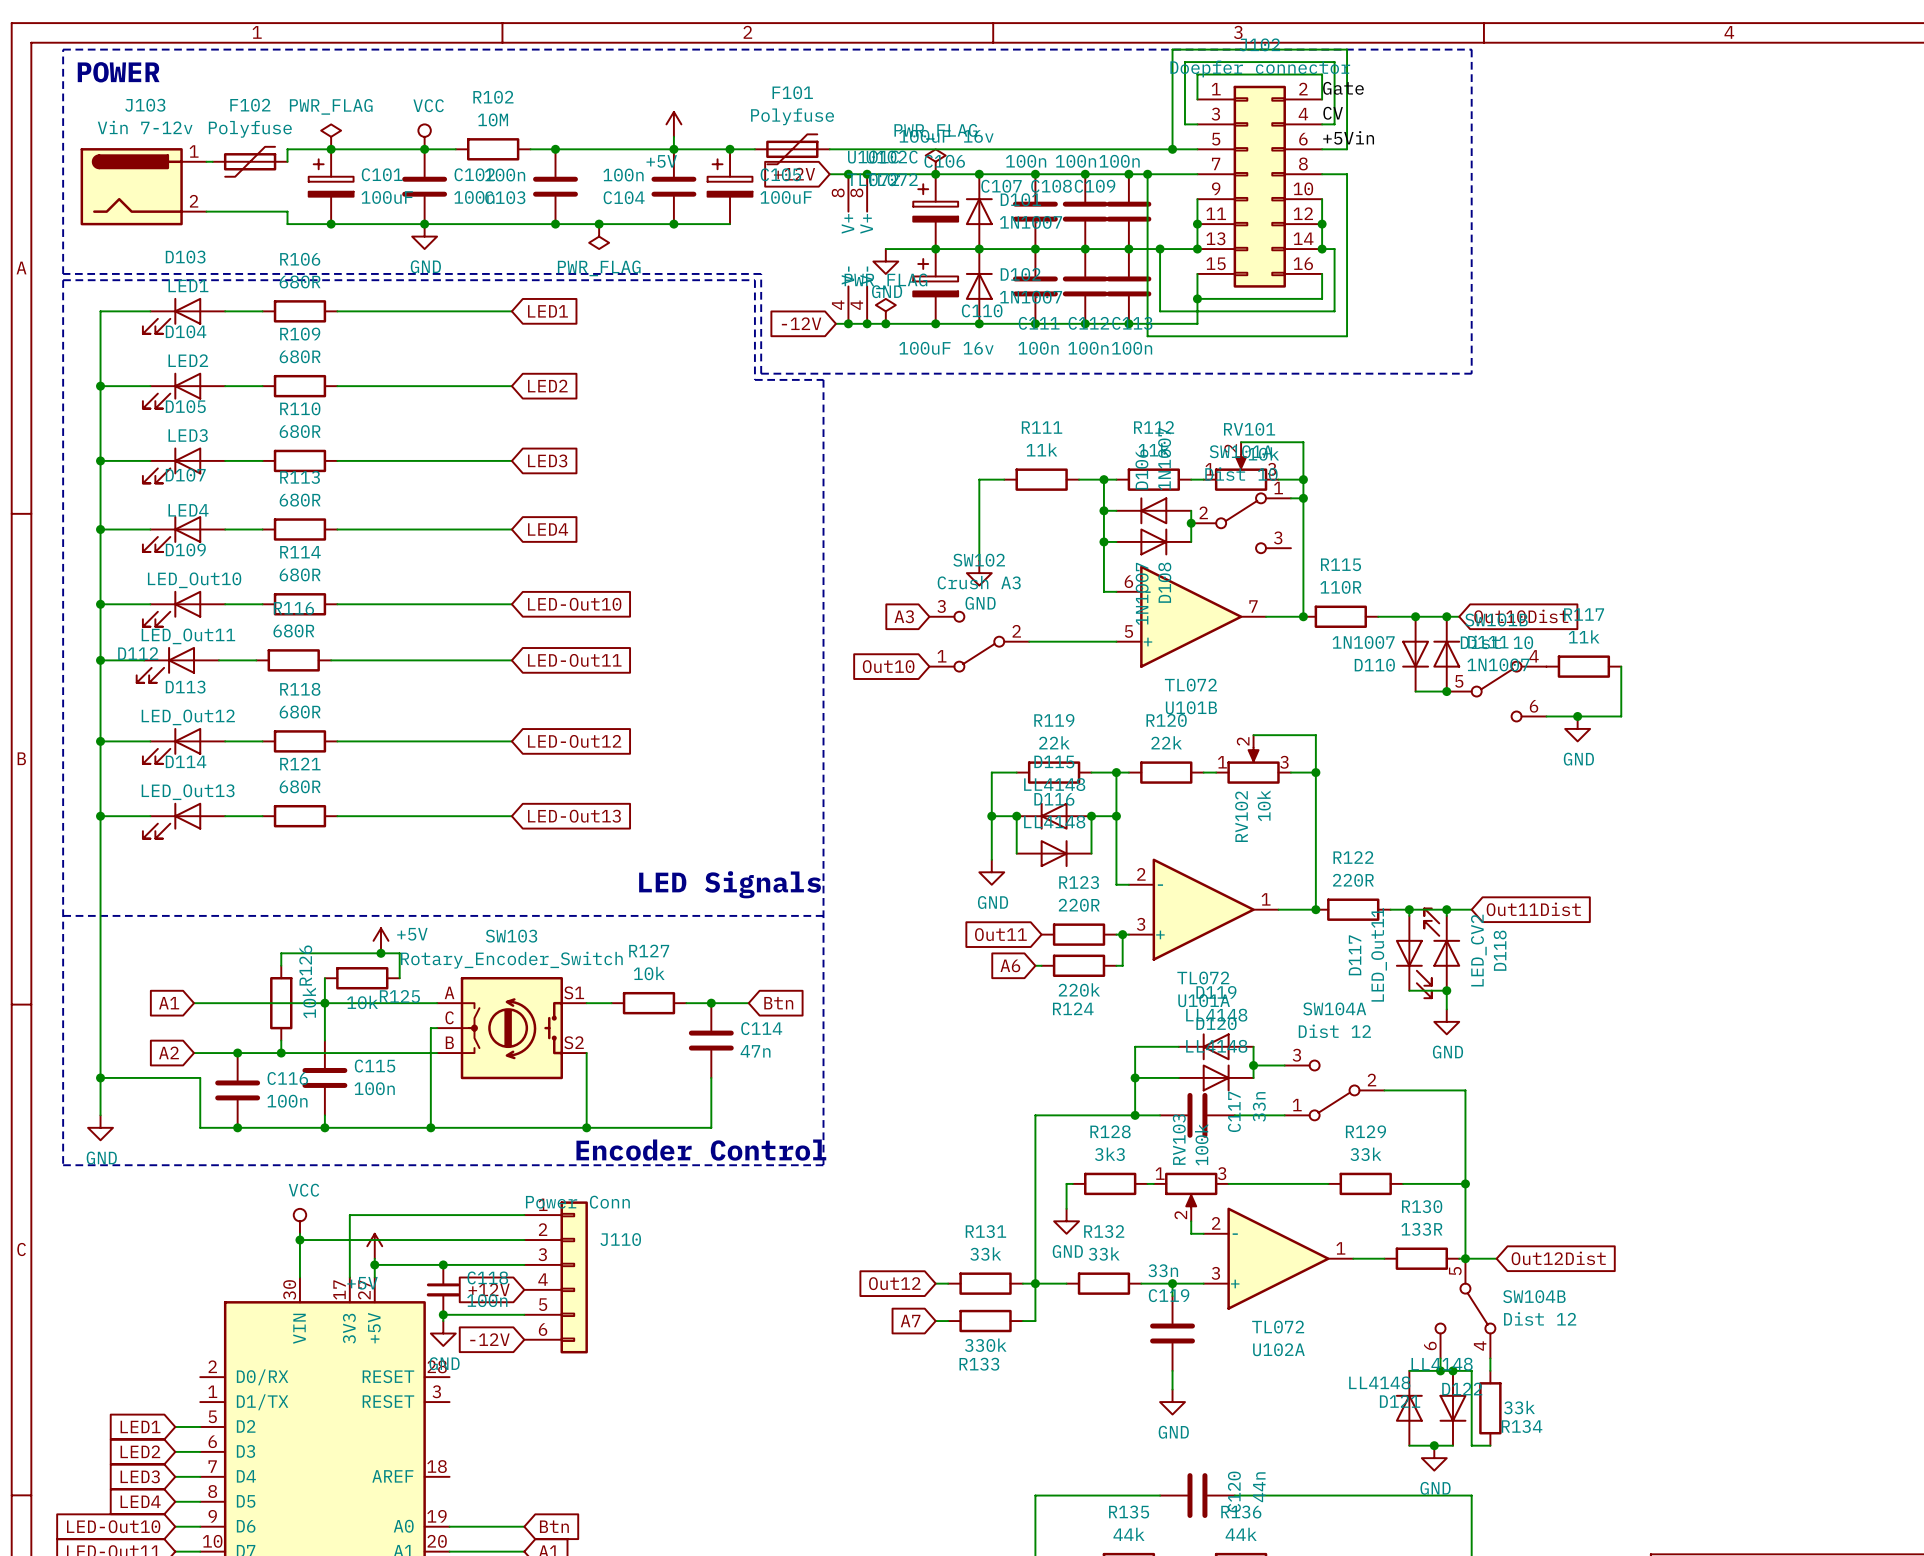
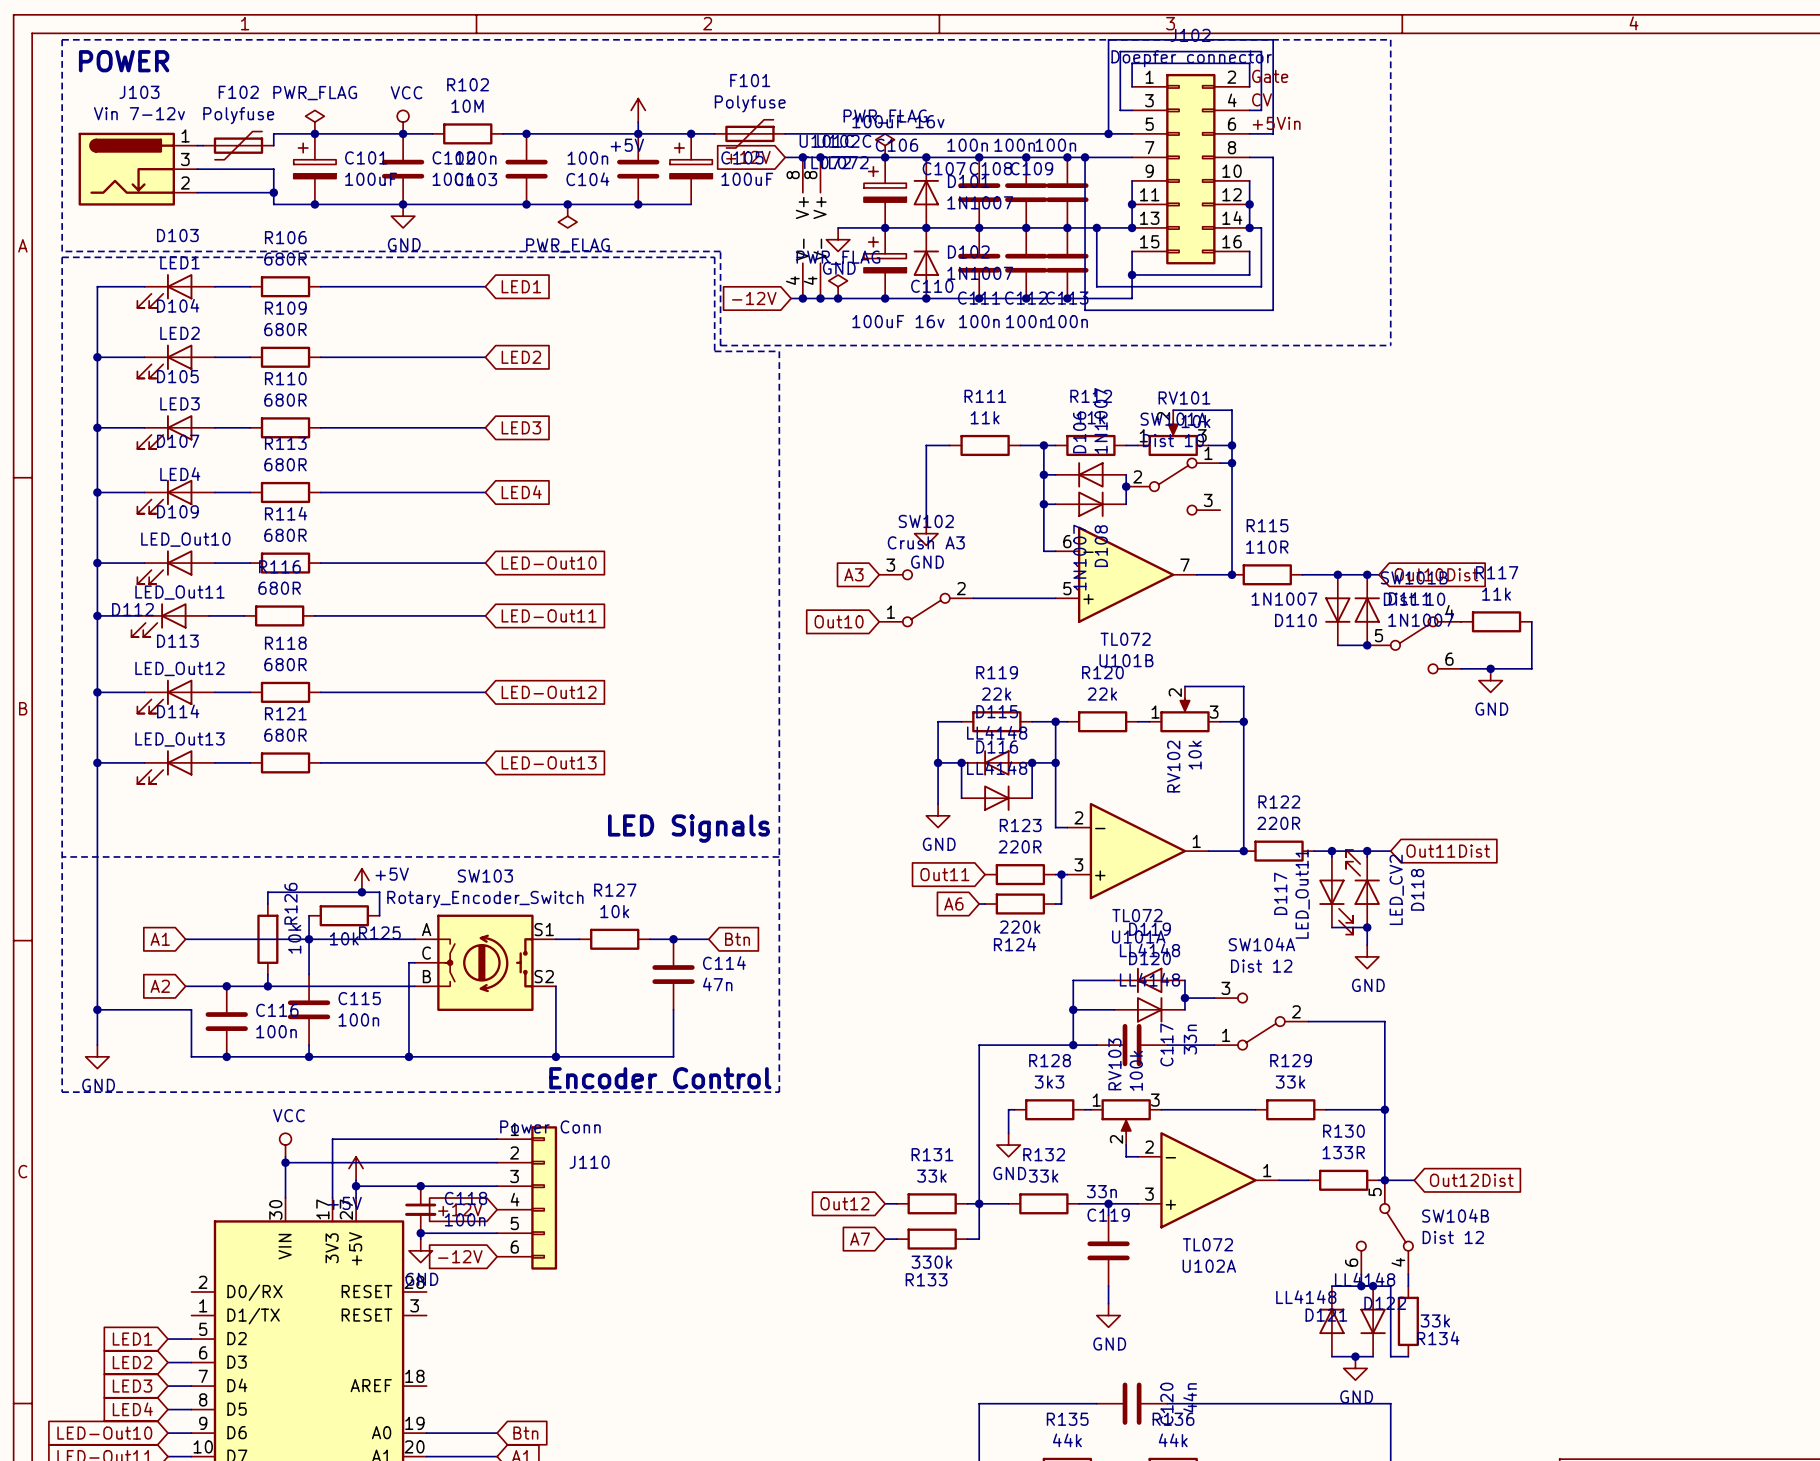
J103 symbol: [80, 148, 207, 226] -> [78, 132, 198, 206]
wire: none -> (197, 169) (273, 169) (273, 192)
junction: none -> (273, 192)

